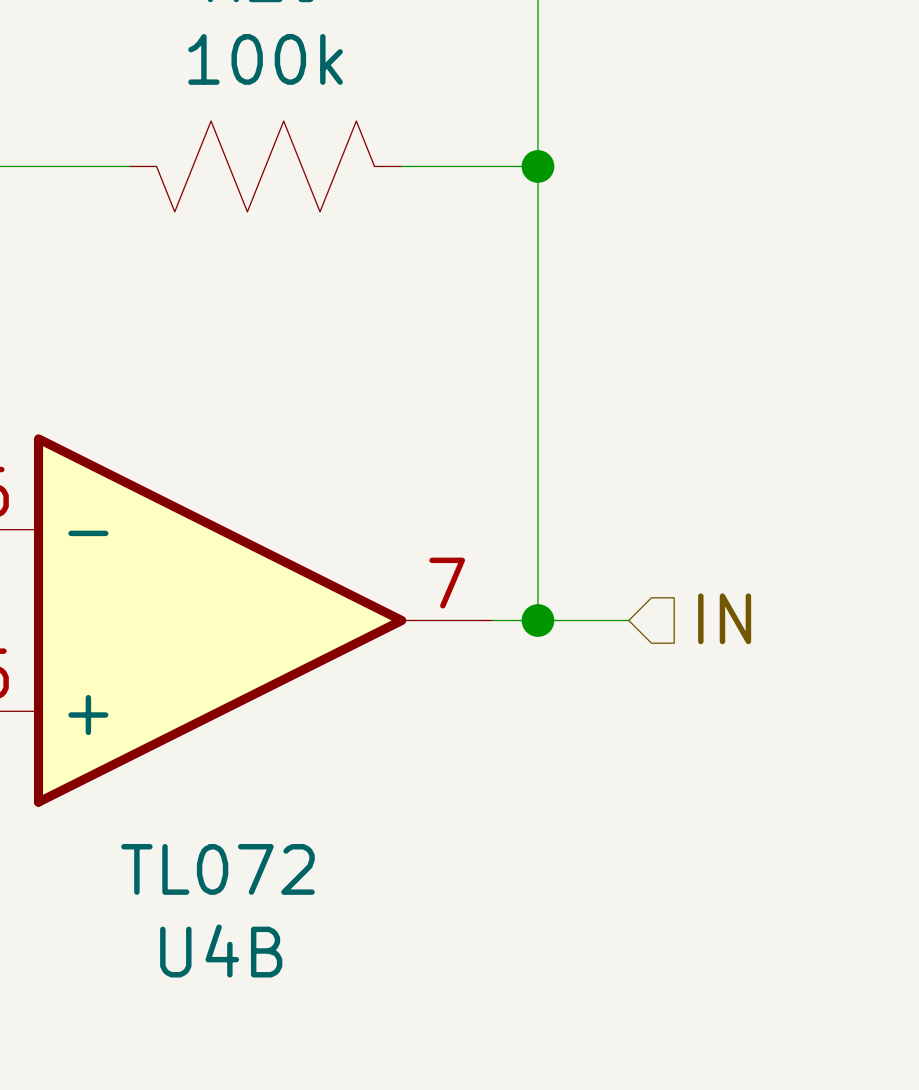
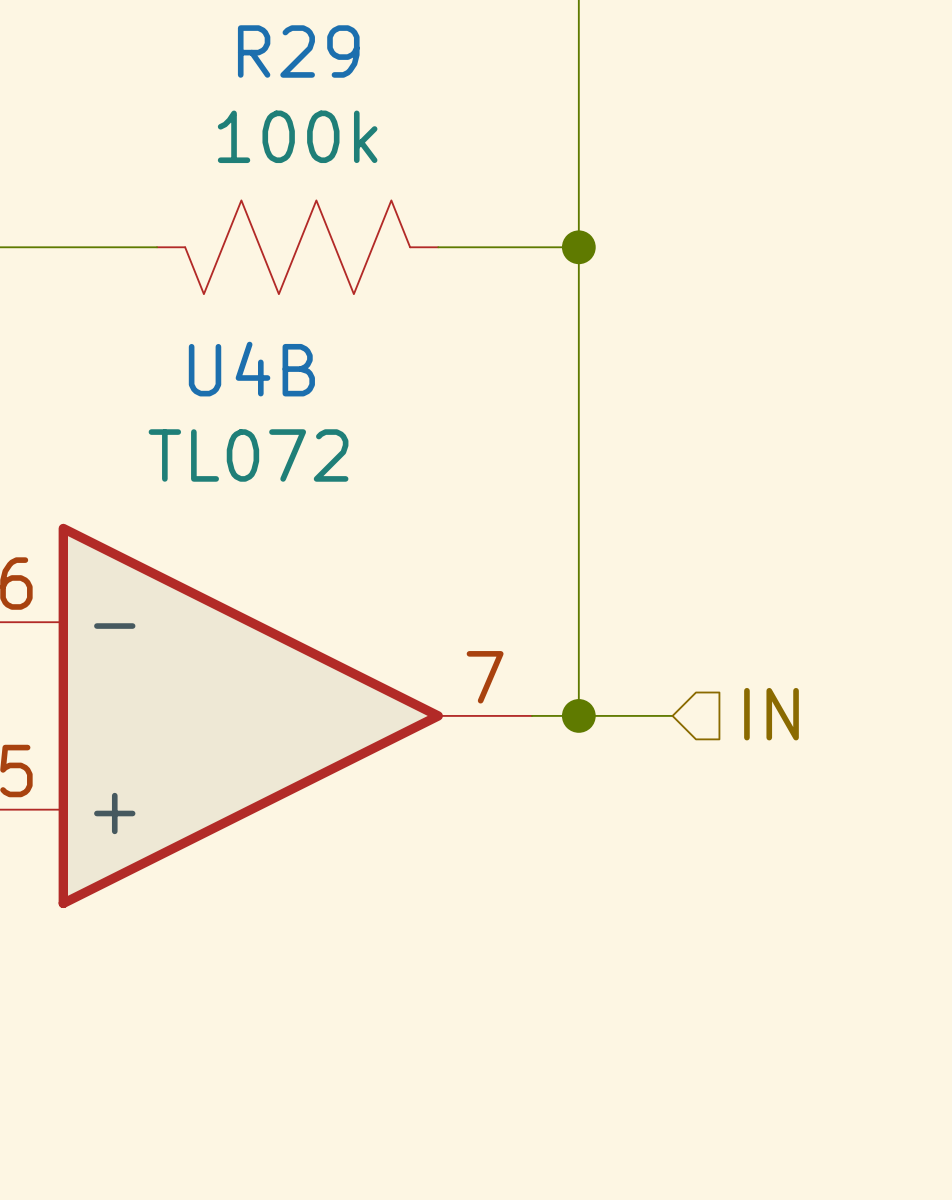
U4B value position: TL072 (217, 869) -> TL072 (248, 455)
U4B name position: U4B (221, 950) -> U4B (251, 369)

